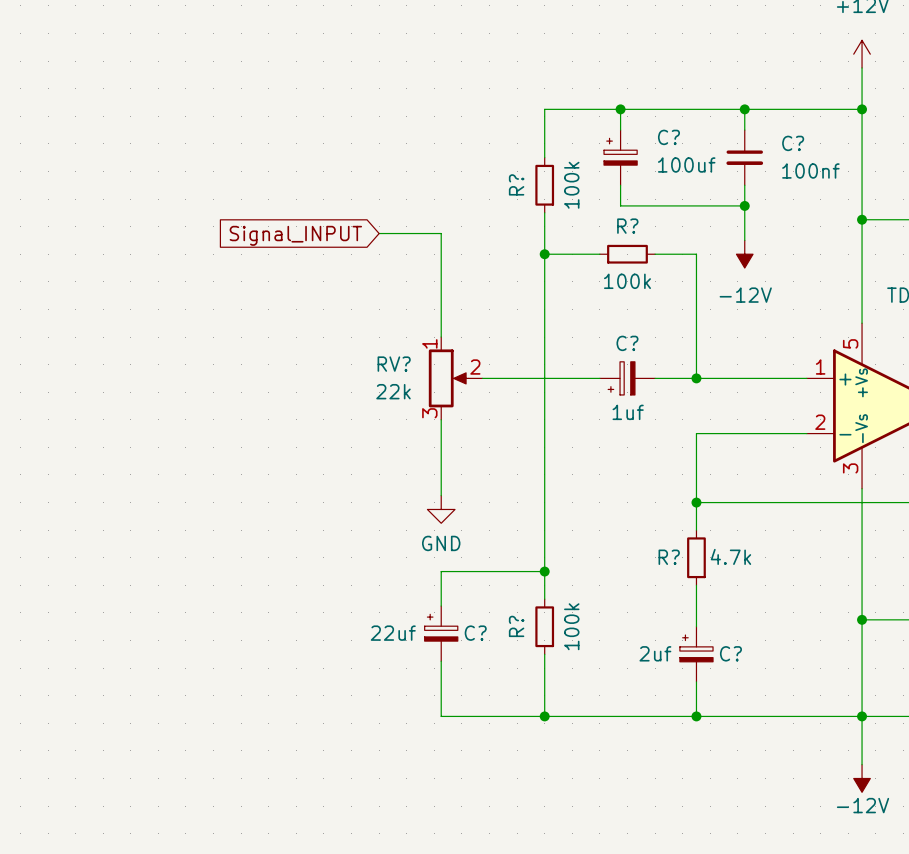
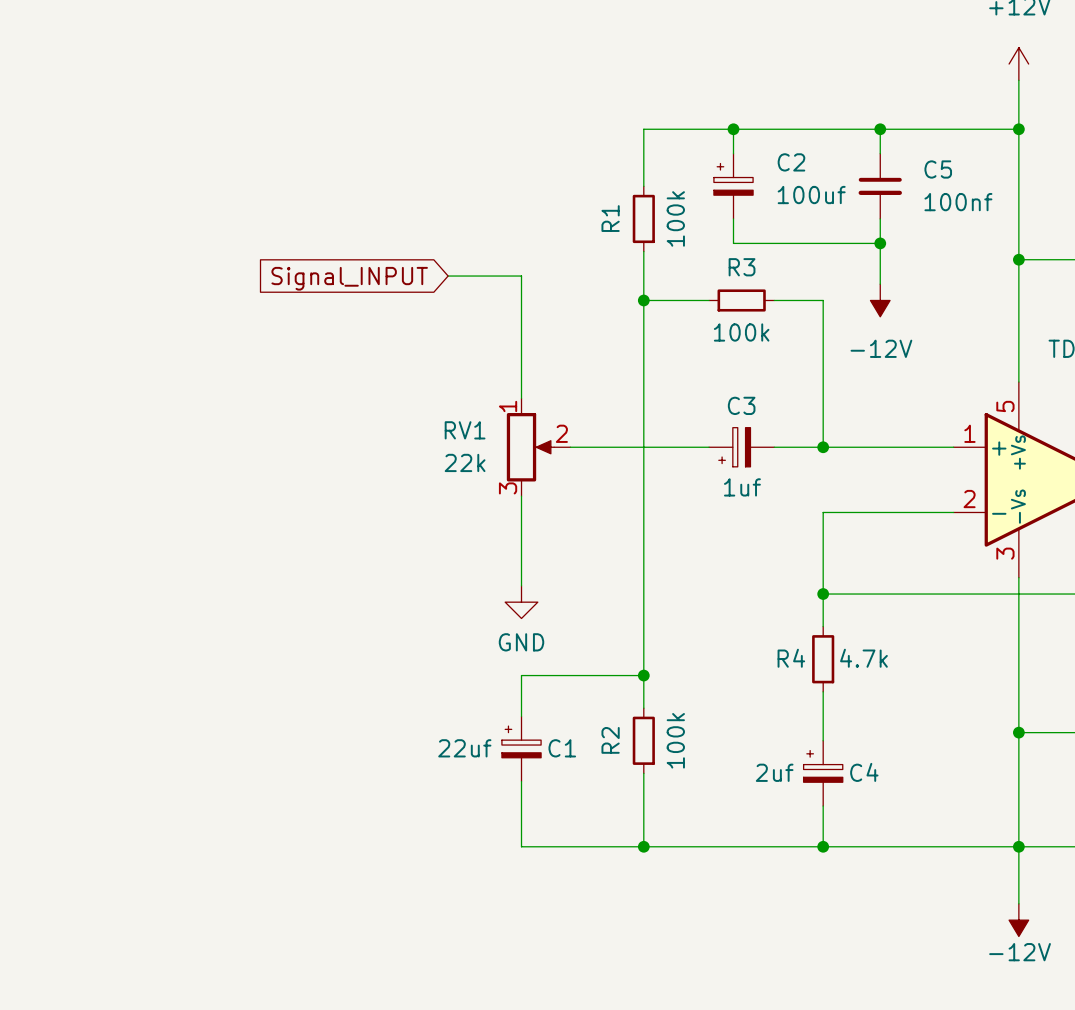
C? name: C? (668, 137) -> C2 (791, 162)
C? name: C? (793, 143) -> C5 (938, 169)
R? name: R? (516, 184) -> R1 (610, 218)
R? name: R? (627, 226) -> R3 (742, 267)
C? name: C? (627, 343) -> C3 (741, 405)
RV? name: RV? (394, 364) -> RV1 (465, 430)
R? name: R? (669, 557) -> R4 (791, 658)
R? name: R? (516, 626) -> R2 (610, 740)
C? name: C? (475, 633) -> C1 (562, 748)
C? name: C? (730, 653) -> C4 (864, 772)

